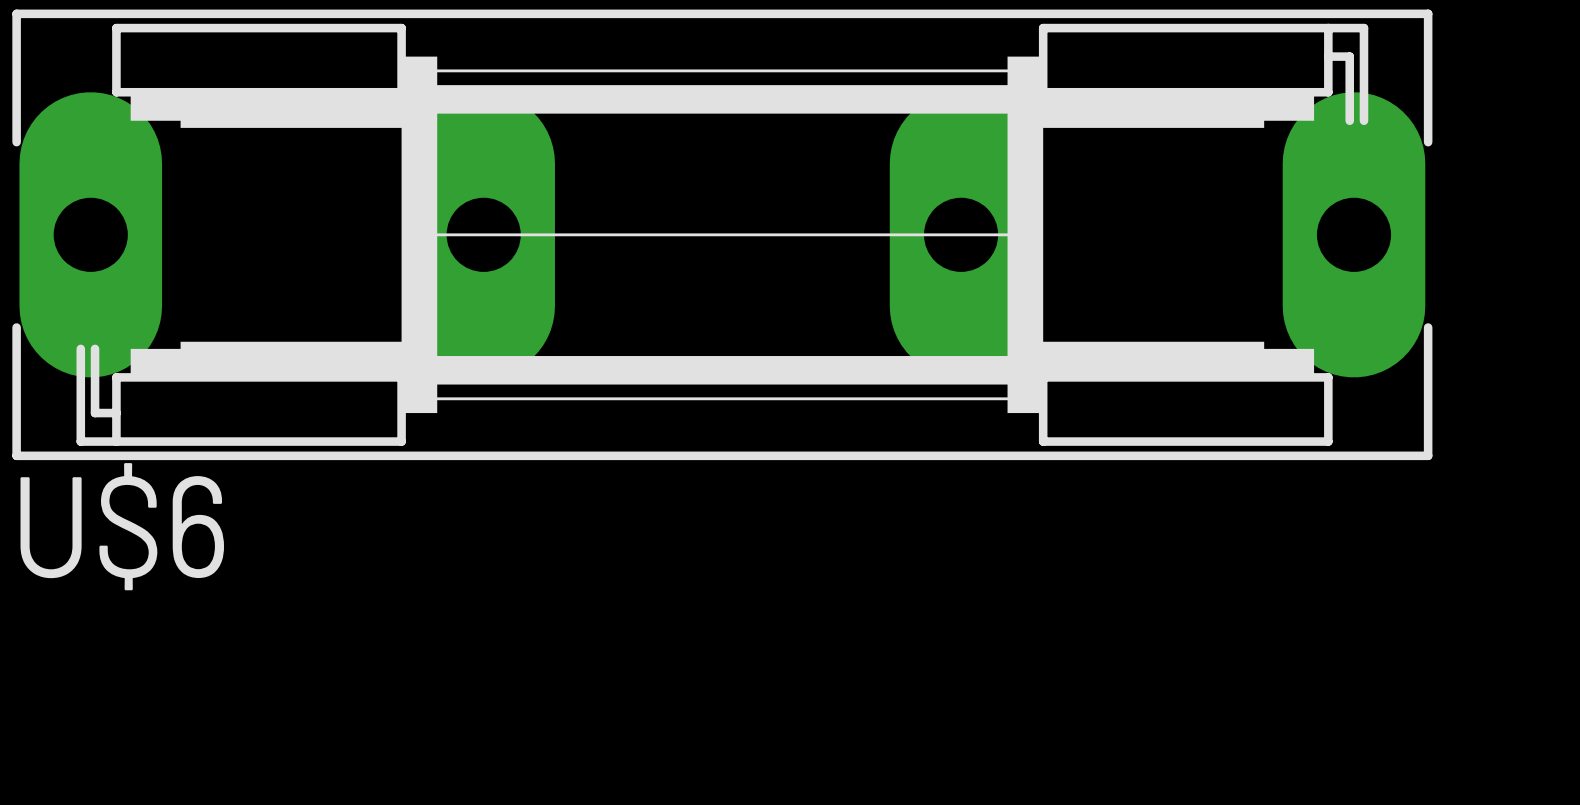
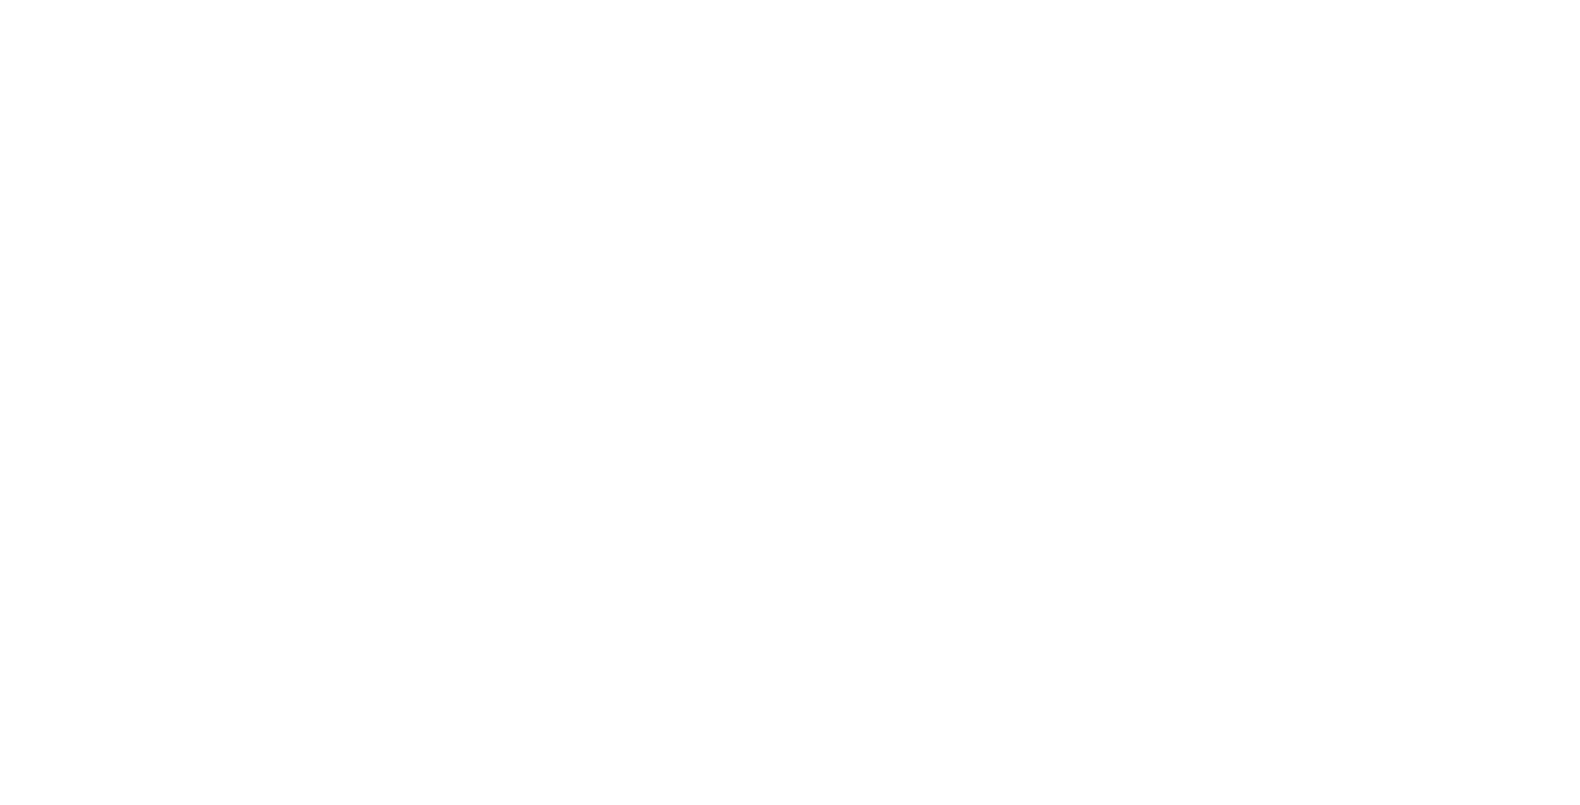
U$6: (722, 234) -> none

